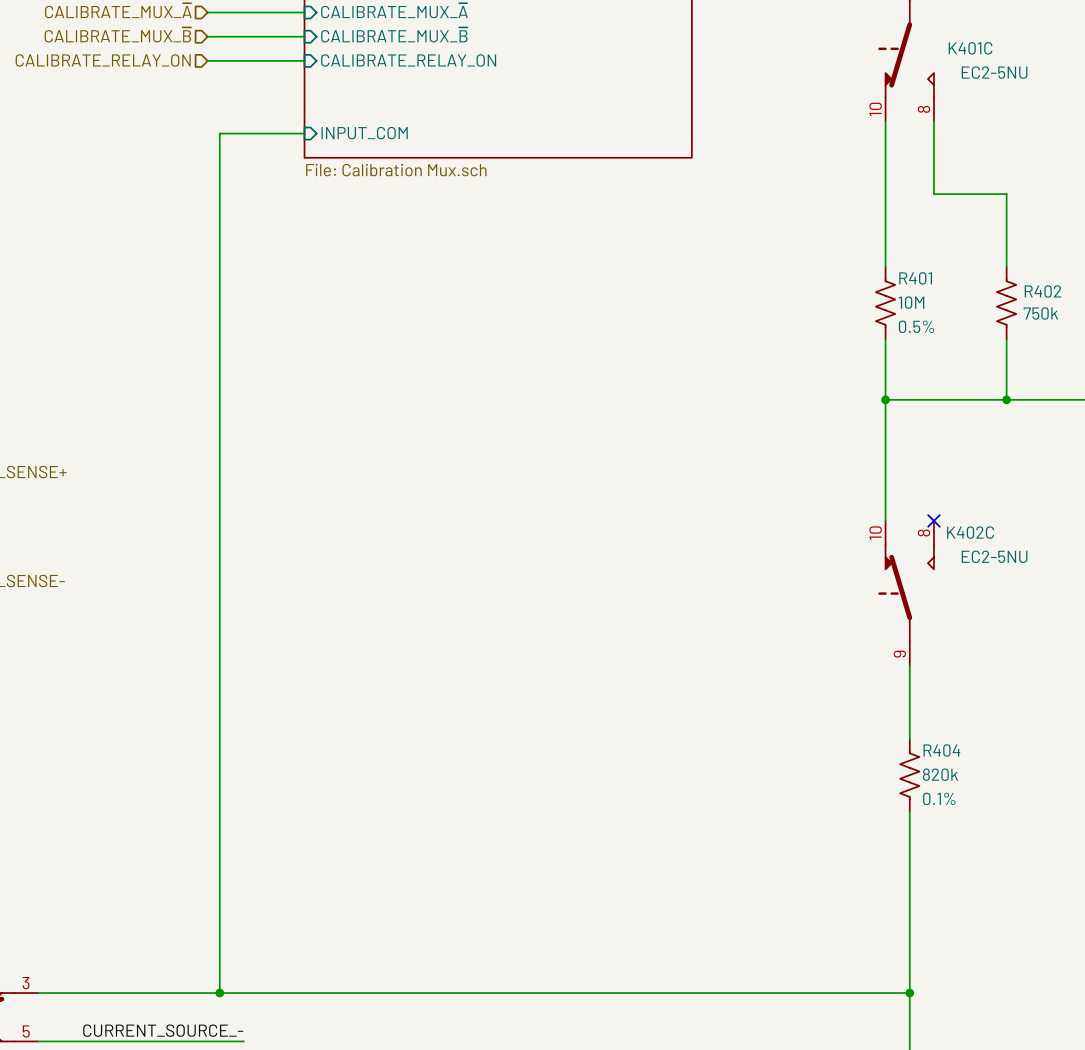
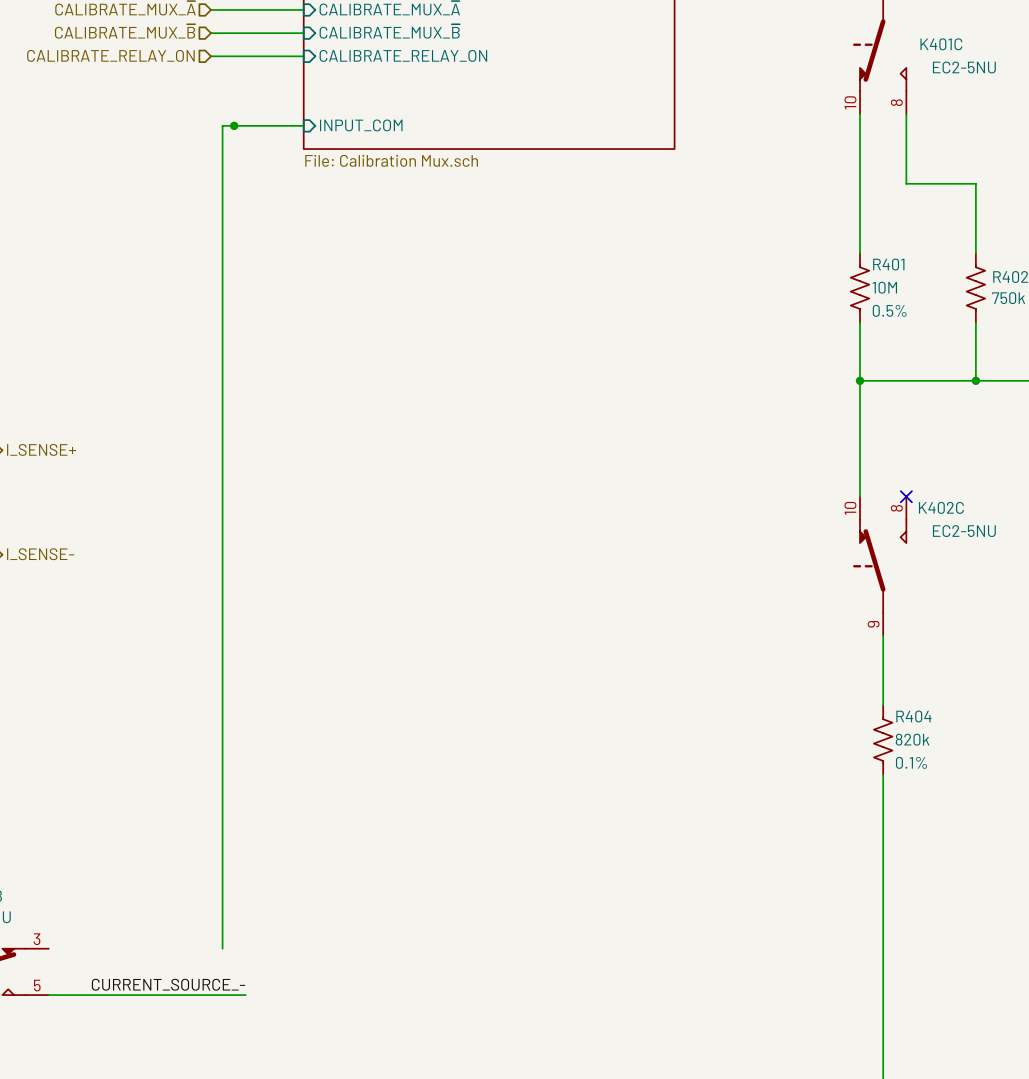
junction: none -> (234, 125)
wire: (38, 993) (909, 993) -> none
junction: (219, 993) -> none
junction: (909, 993) -> none

